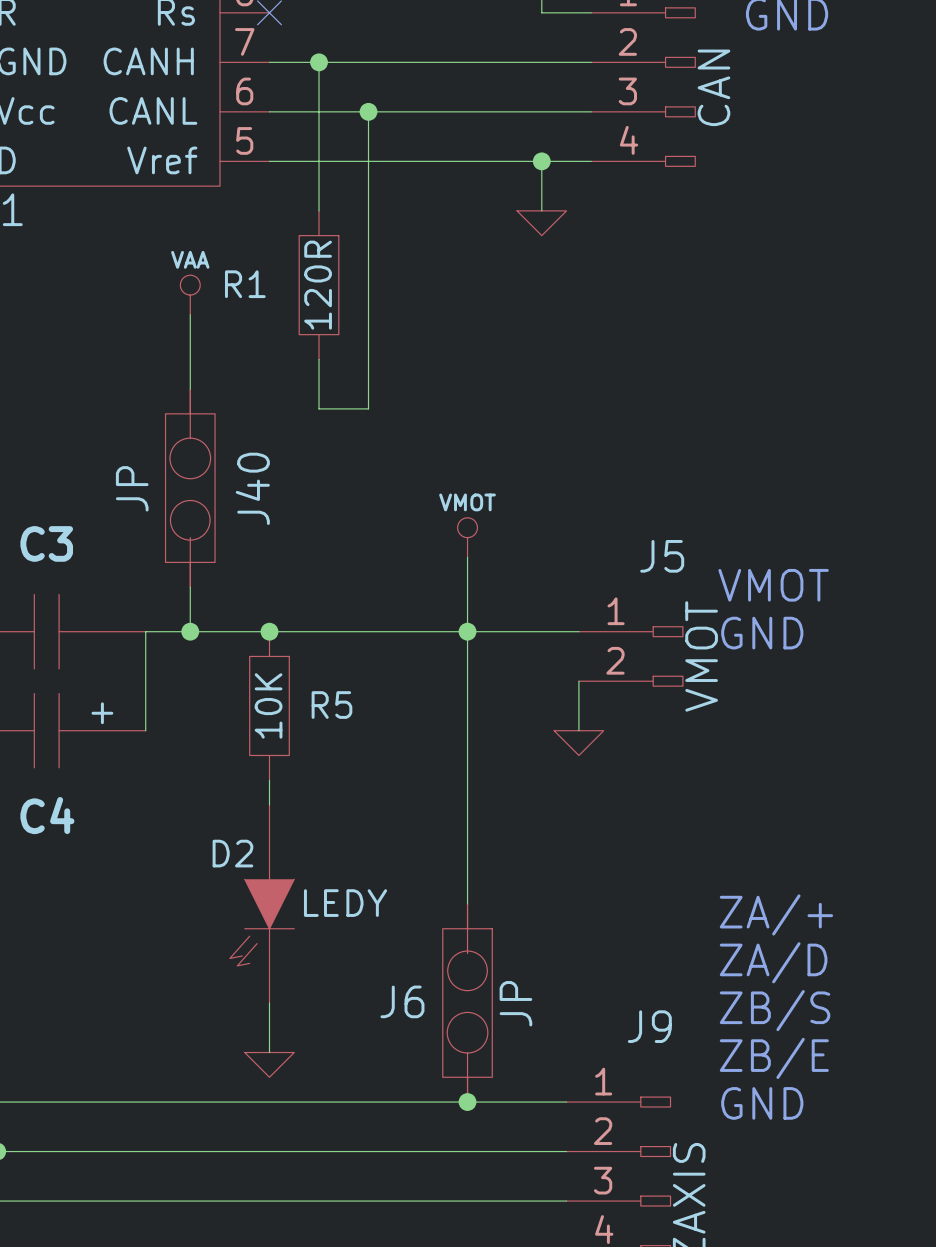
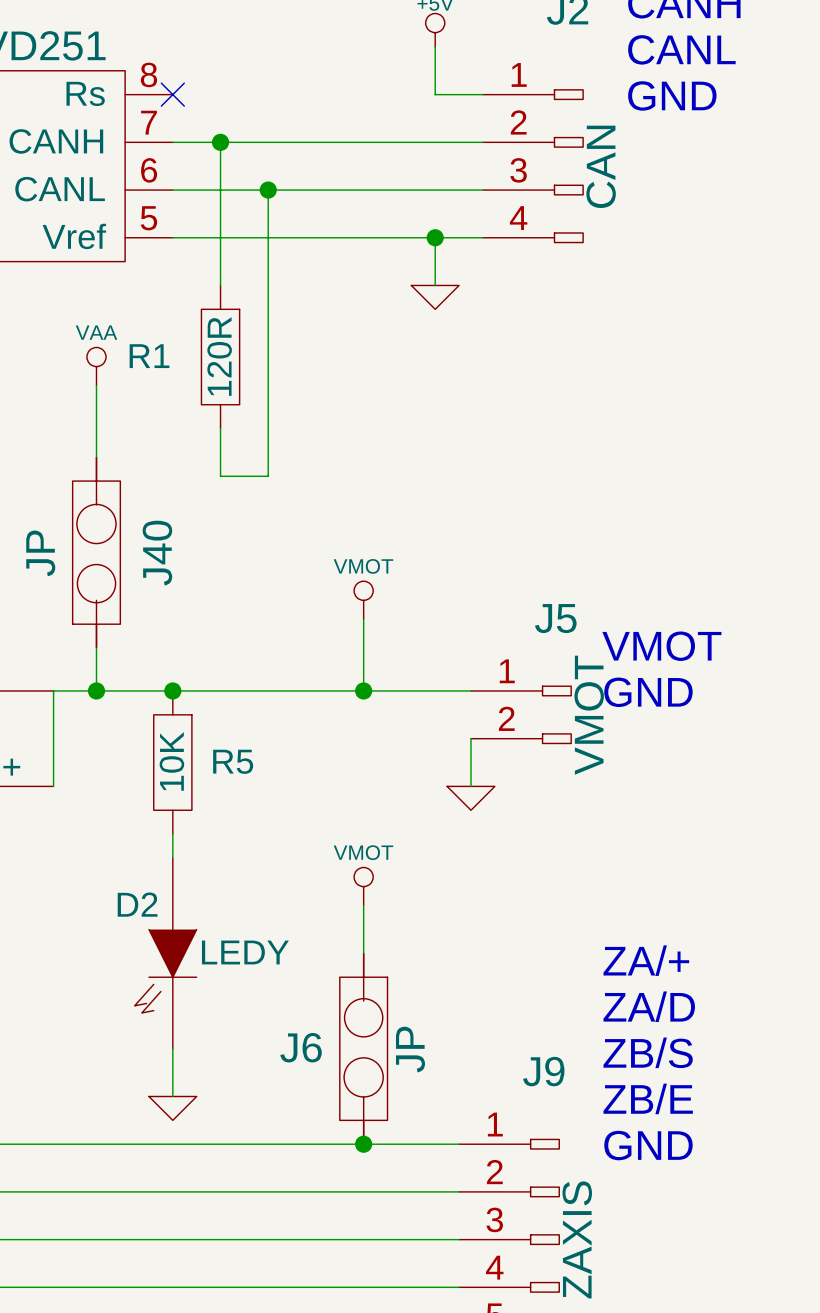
wire: (467, 631) (467, 854) -> none
power symbol: none -> VMOT (363, 886)

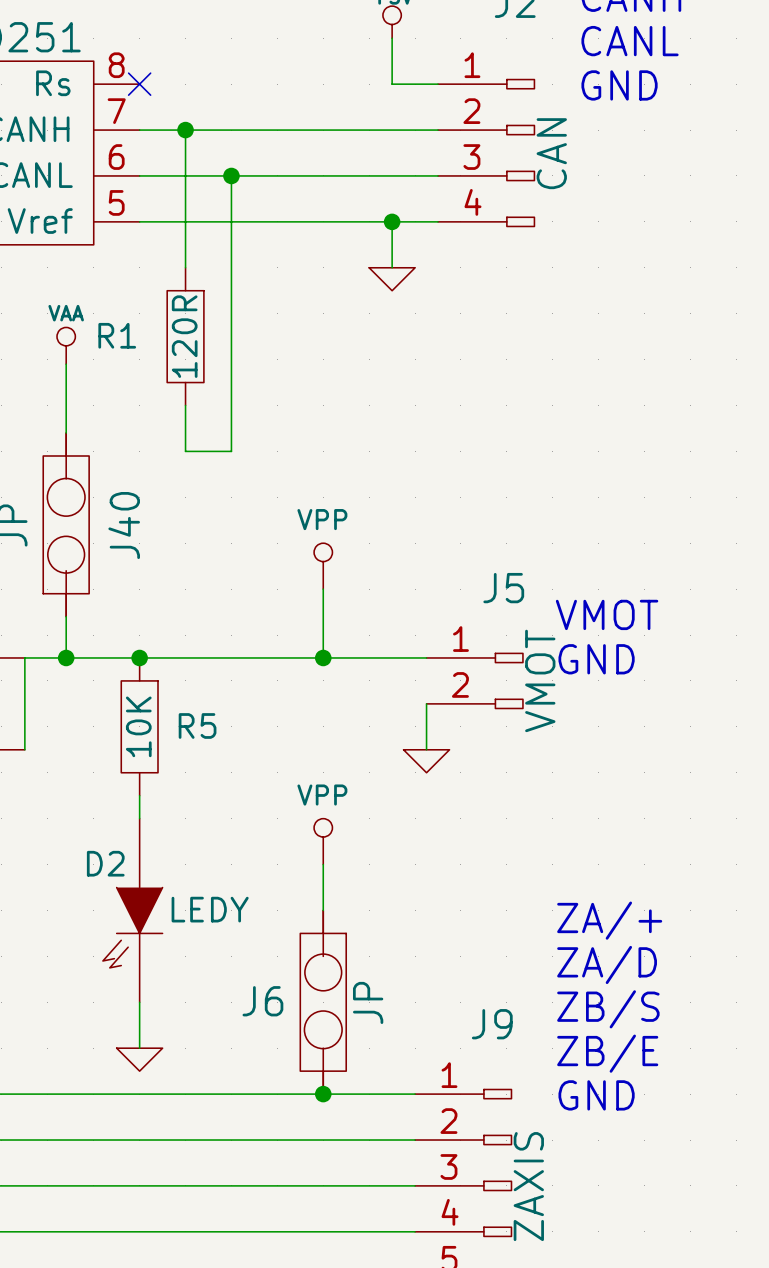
power symbol: VMOT (363, 600) -> VPP (323, 566)
power symbol: VMOT (363, 886) -> VPP (323, 841)

